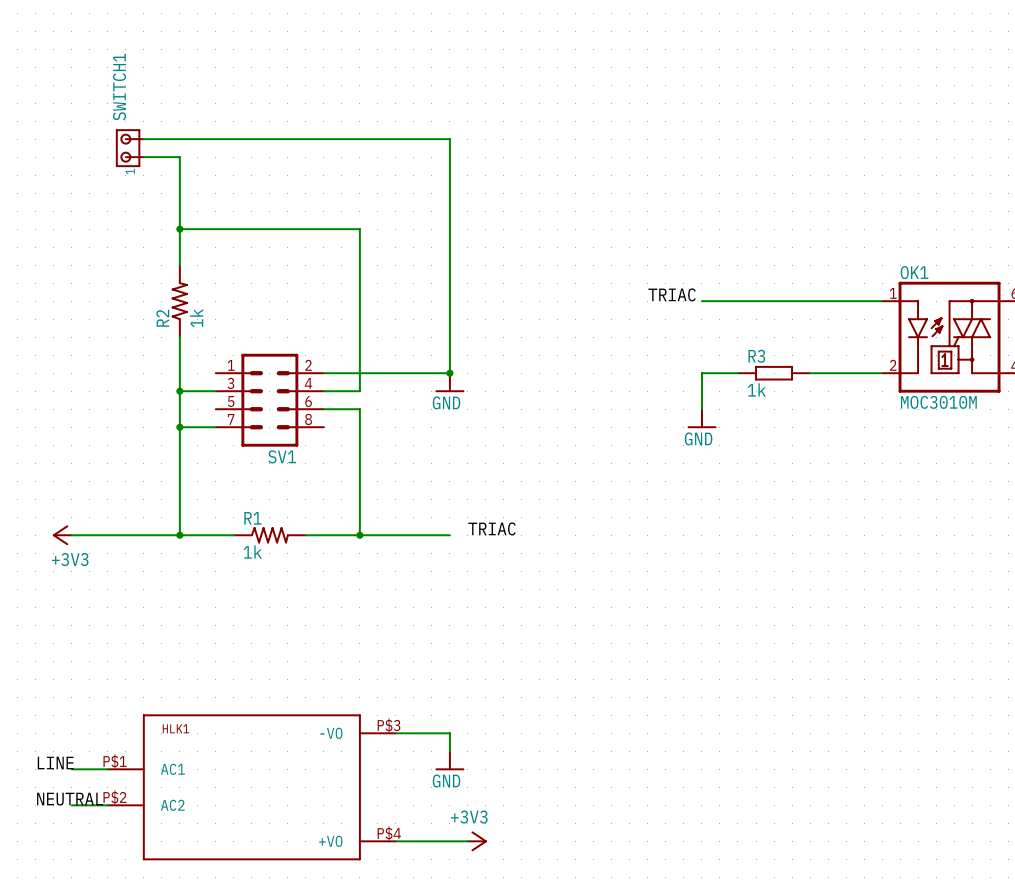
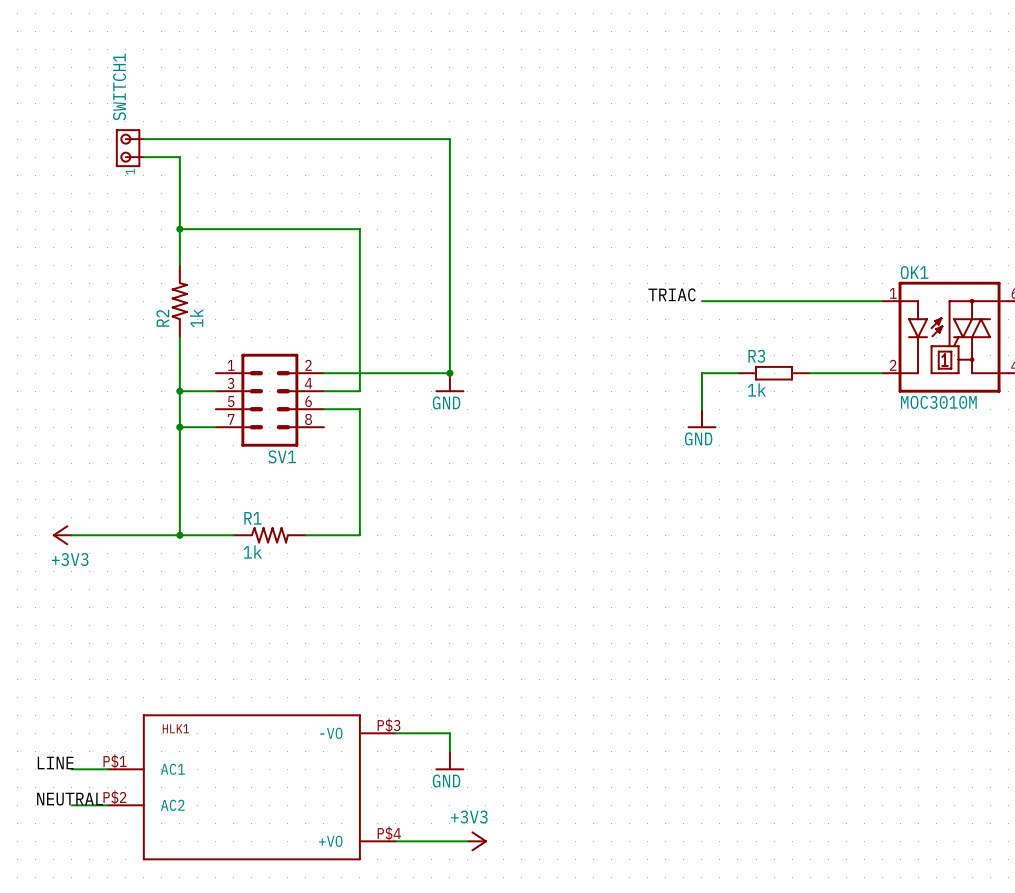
label: TRIAC (492, 528) -> none
wire: (359, 535) (449, 535) -> none
junction: (359, 535) -> none

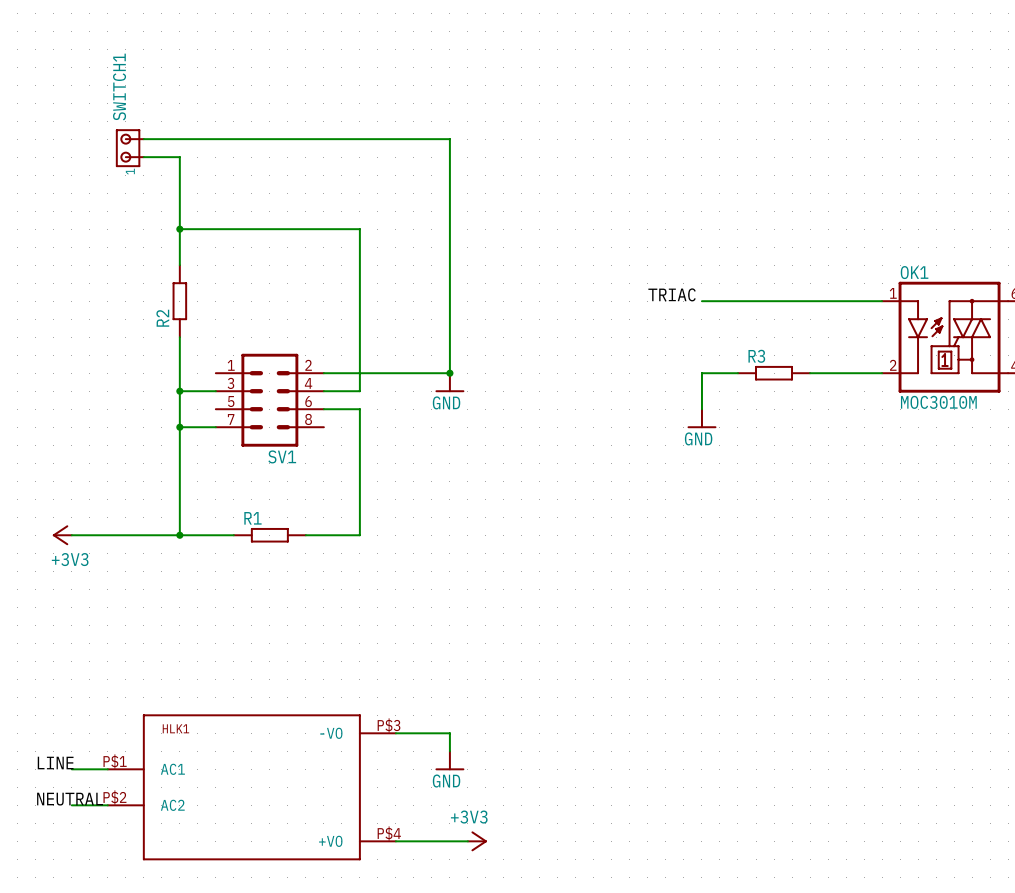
R2 symbol: [171, 265, 188, 338] -> [172, 265, 188, 338]
R2 value: 1k (196, 318) -> none
R3 value: 1k (756, 389) -> none
R1 symbol: [233, 527, 306, 544] -> [233, 528, 306, 543]
R1 value: 1k (252, 551) -> none

